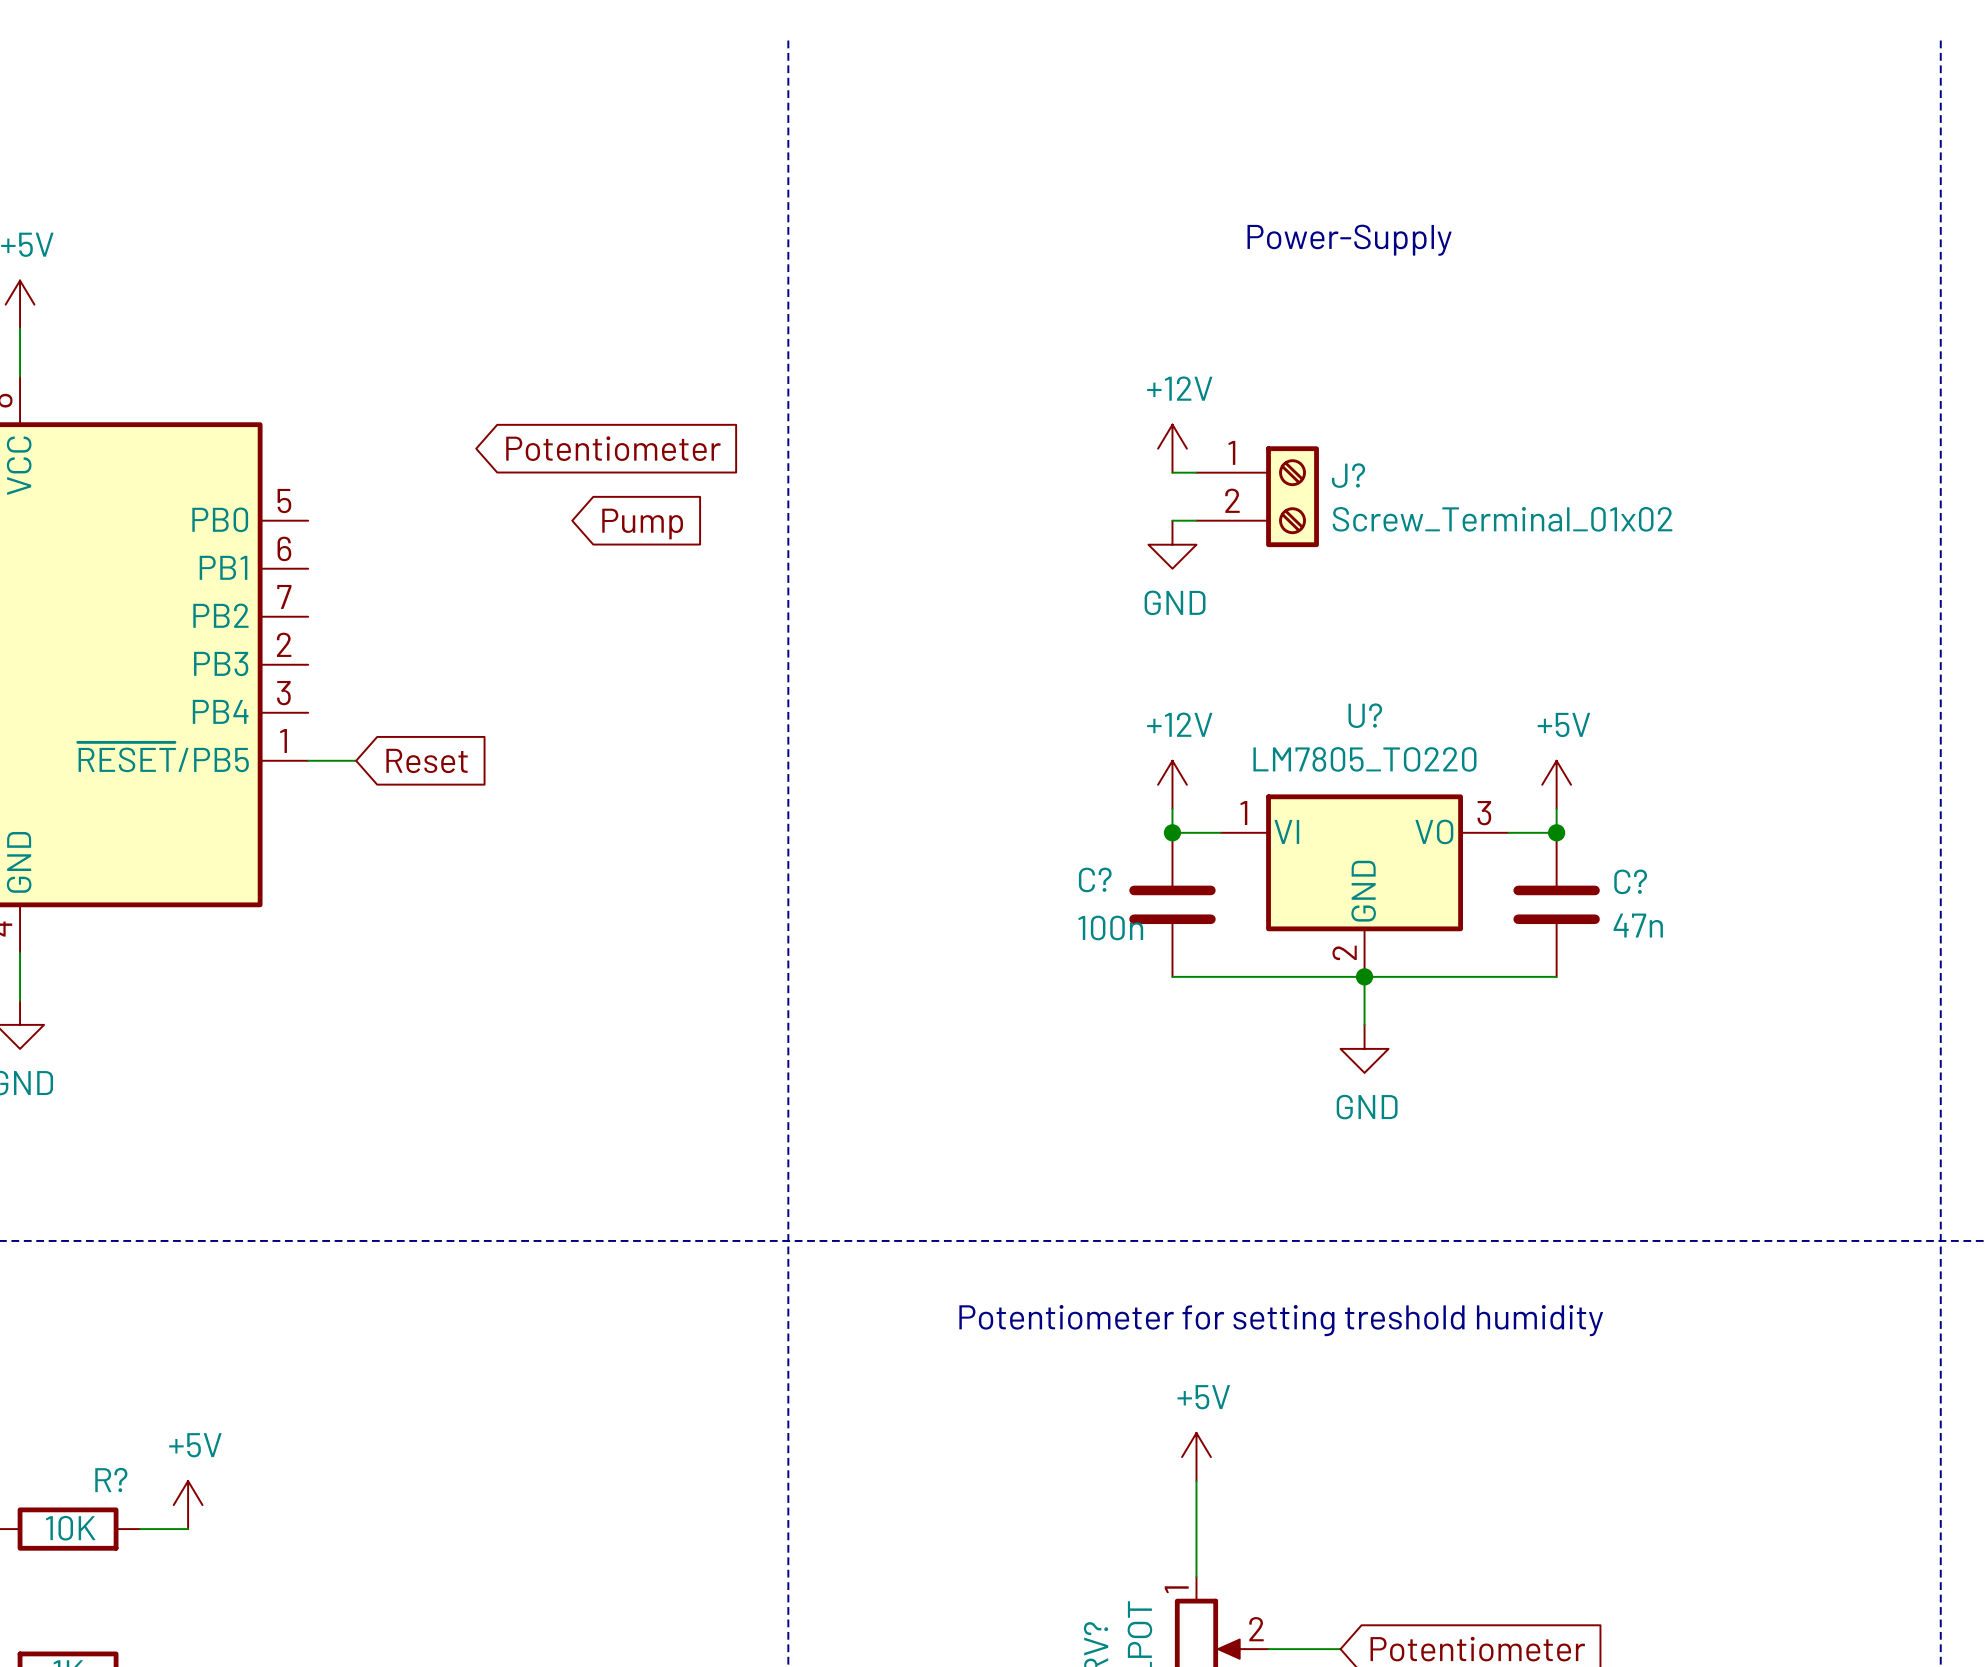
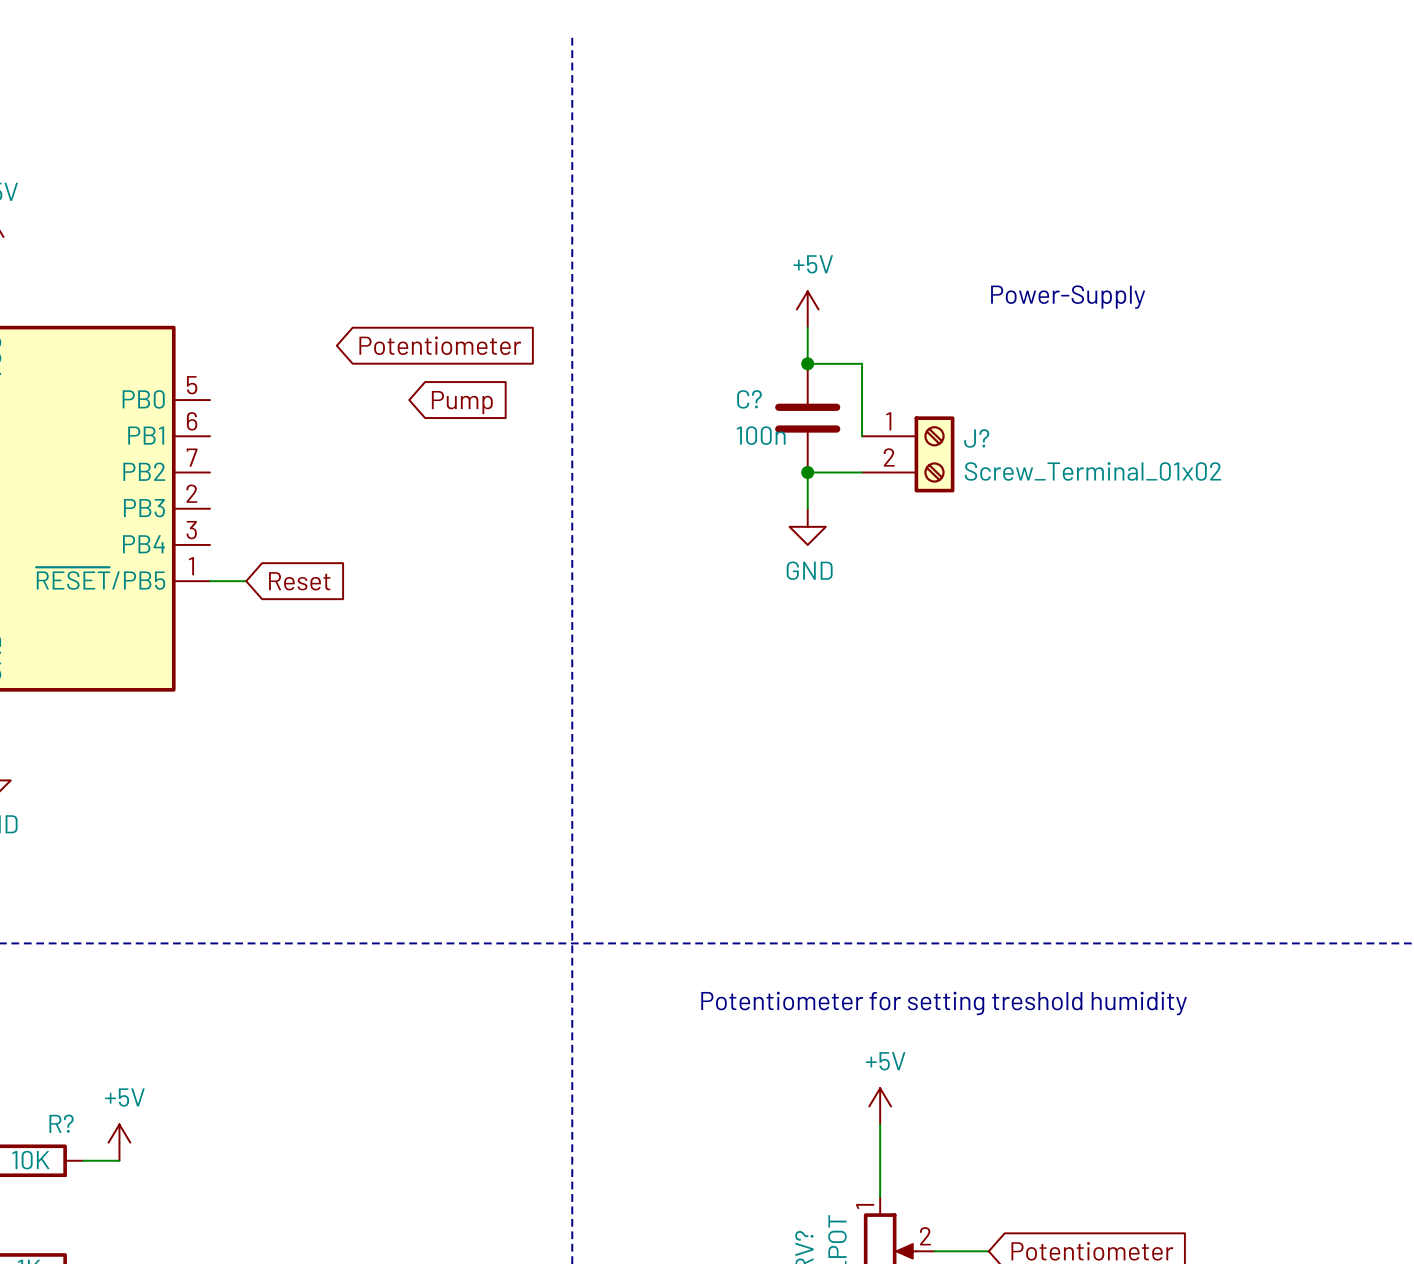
text position: Power-Supply (1349, 240) -> Power-Supply (1068, 297)
power symbol: none -> +5V (807, 309)
wire: none -> (807, 327) (807, 363) (862, 363) (862, 436)
power symbol: +12V (1172, 448) -> none
junction: none -> (807, 363)
wire: (1172, 472) (1196, 472) -> none
J? position: (1257, 496) -> (908, 454)
wire: (1172, 520) (1196, 520) -> none
power symbol position: GND (1172, 544) -> GND (807, 526)
junction: none -> (807, 472)
wire: none -> (862, 472) (807, 472) (807, 508)
power symbol: +12V (1172, 784) -> none
power symbol: +5V (1556, 784) -> none
wire: (1172, 808) (1172, 832) (1220, 832) -> none
wire: (1556, 808) (1556, 832) (1508, 832) -> none
junction: (1172, 832) -> none
junction: (1556, 832) -> none
U?: LM7805_TO220 (1364, 885) -> none
C? position: (1172, 904) -> (807, 418)
C?: 47n (1556, 904) -> none
wire: (1172, 976) (1556, 976) -> none
wire: (1364, 976) (1364, 1024) -> none
junction: (1364, 976) -> none
power symbol: GND (1364, 1048) -> none

